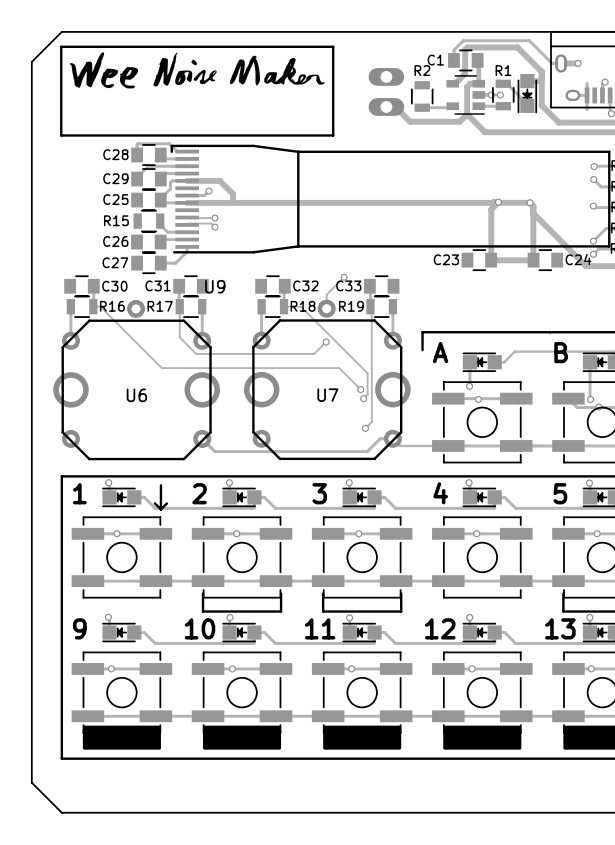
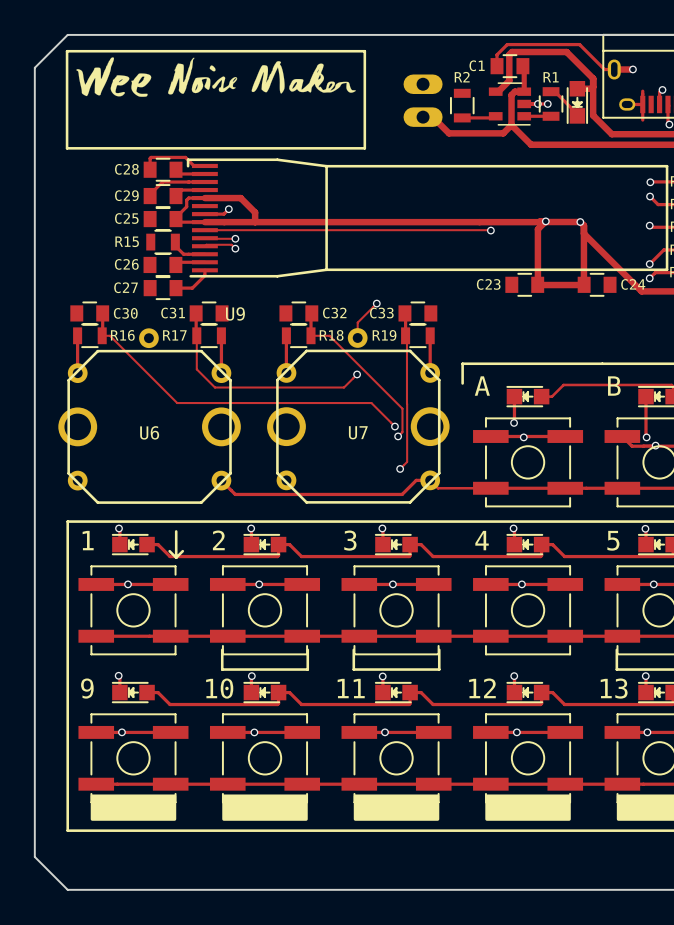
track: none -> (204, 230) (490, 230)
via: none -> (490, 230)

